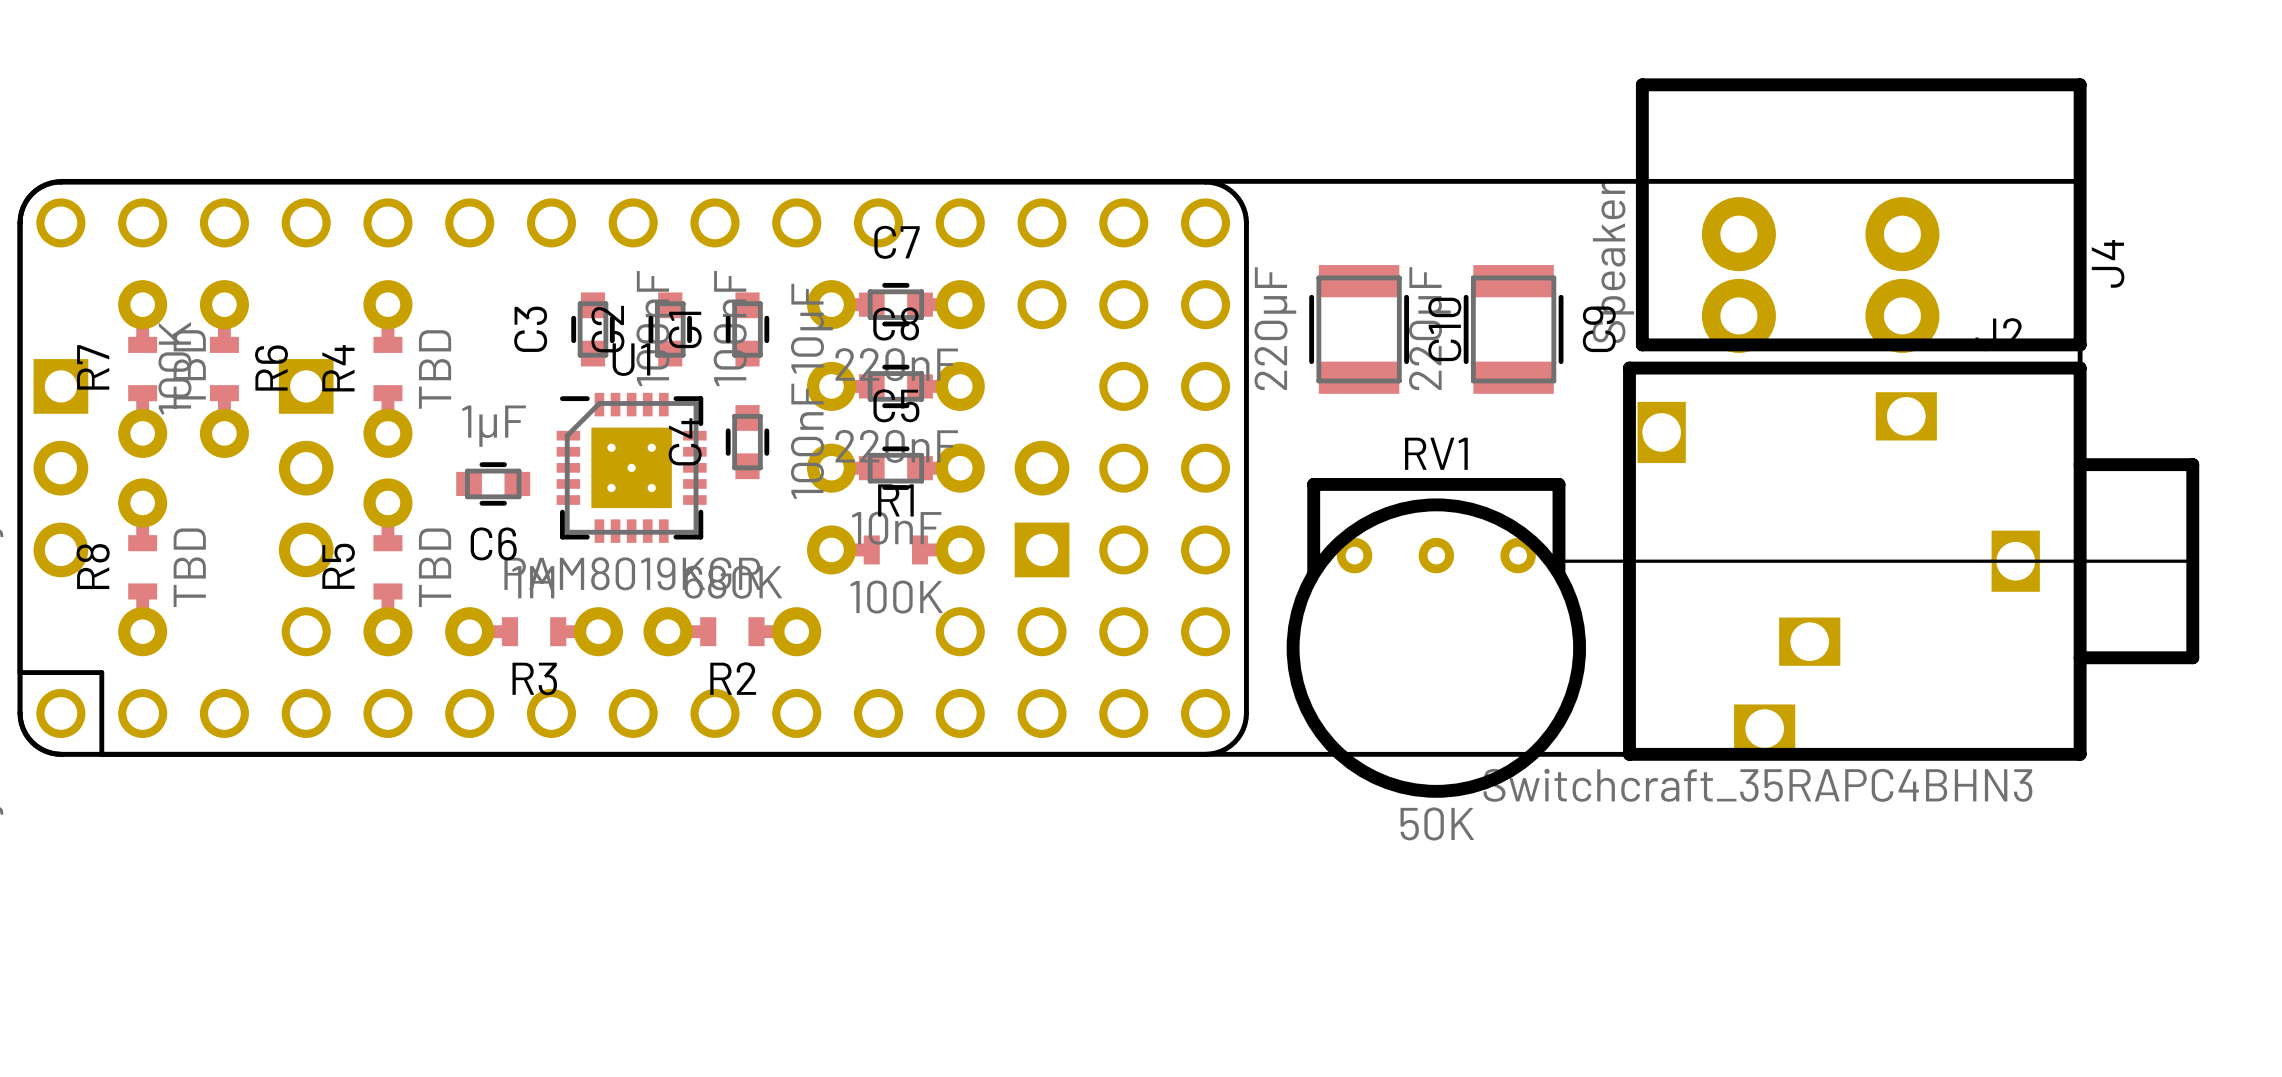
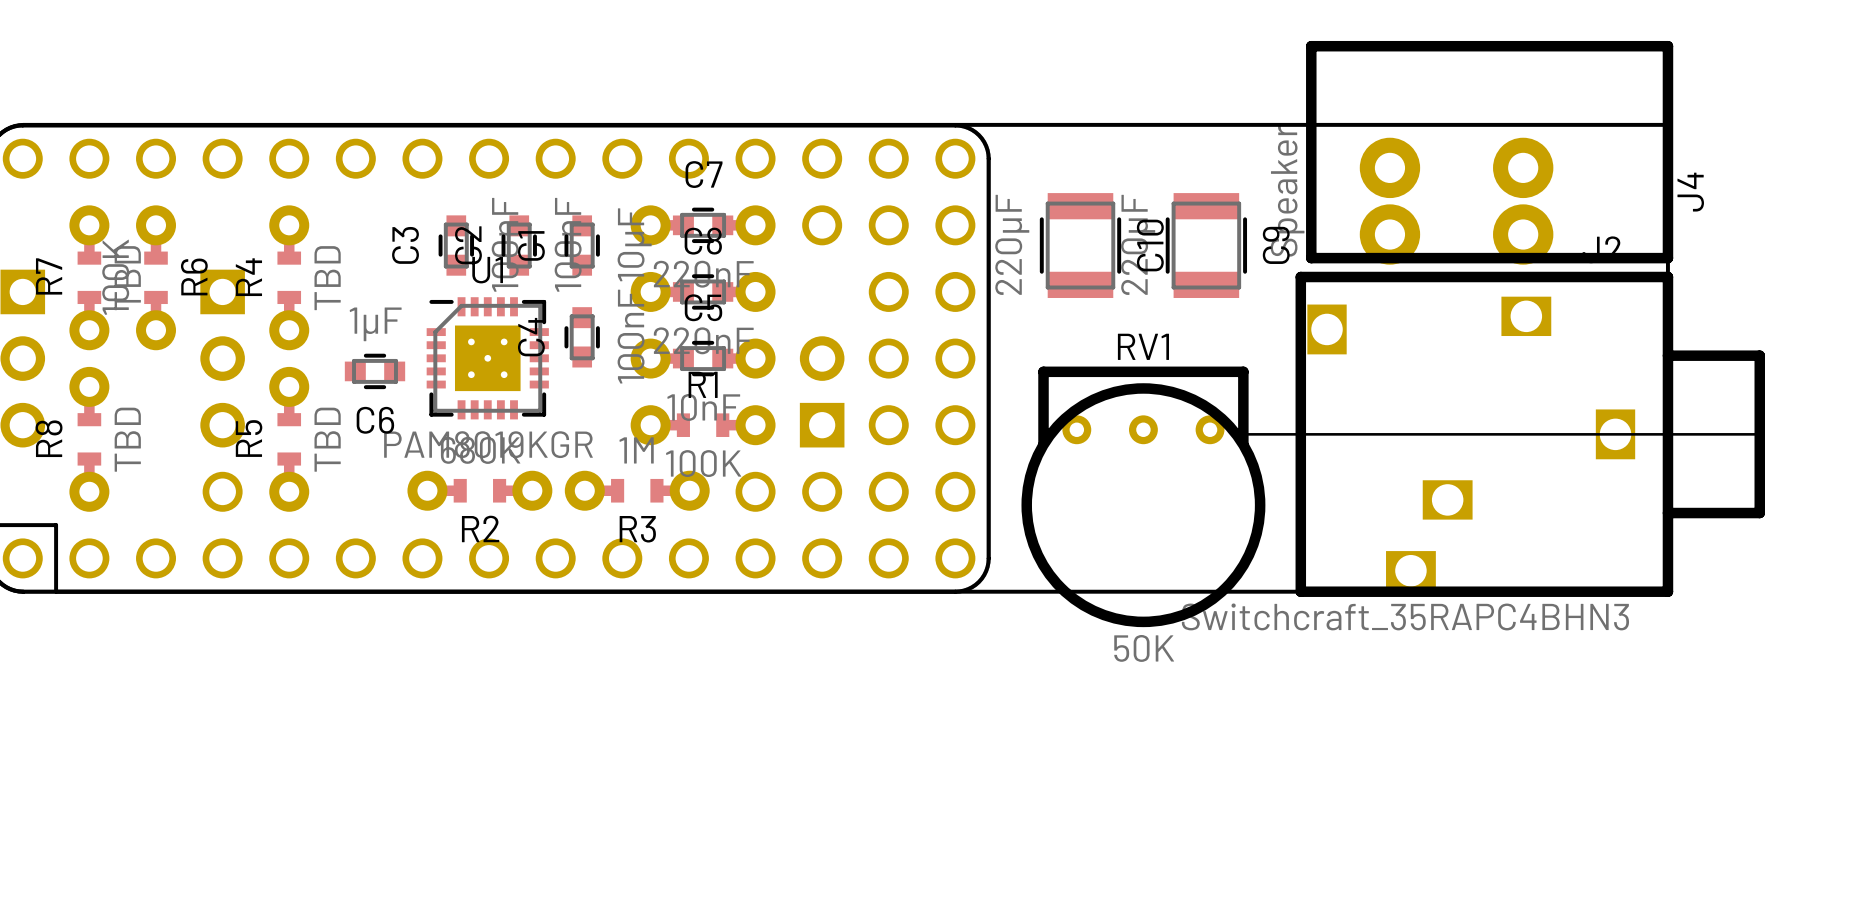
R3 position: (534, 631) -> (637, 490)
R2 position: (732, 631) -> (479, 490)

